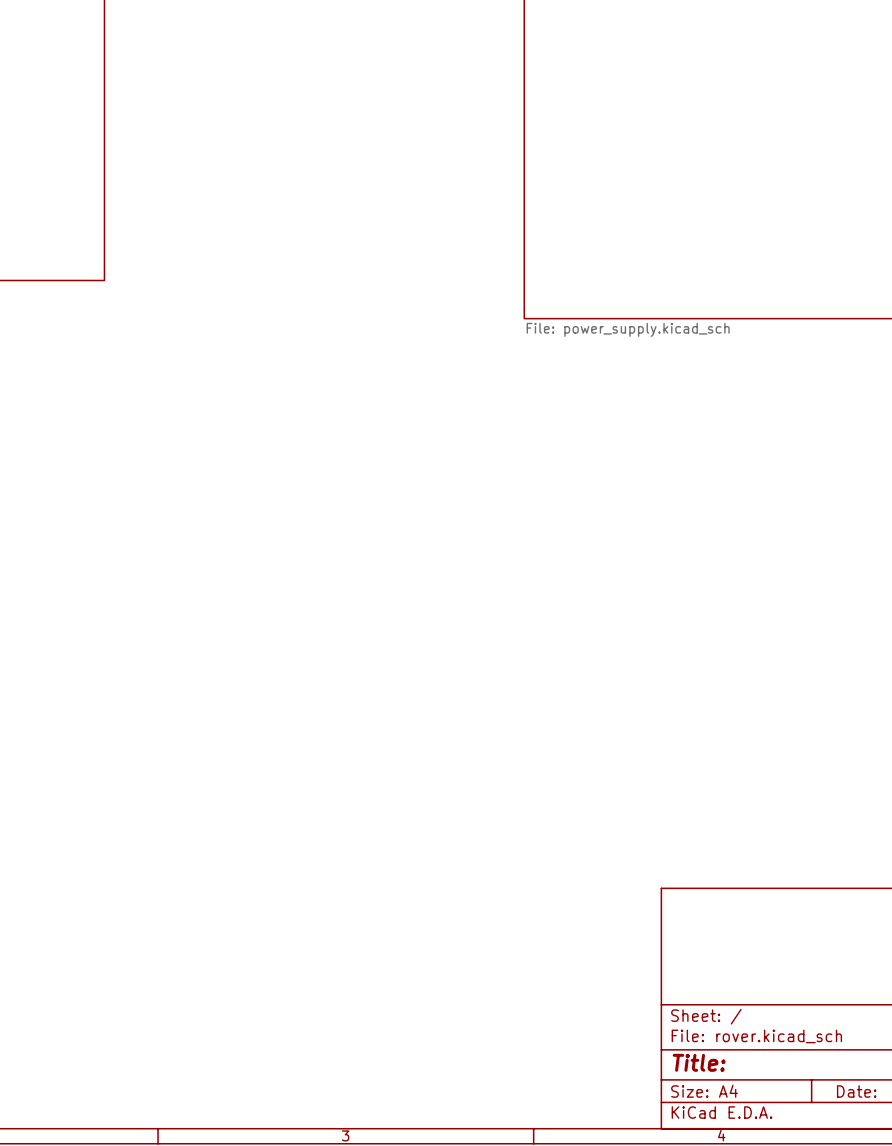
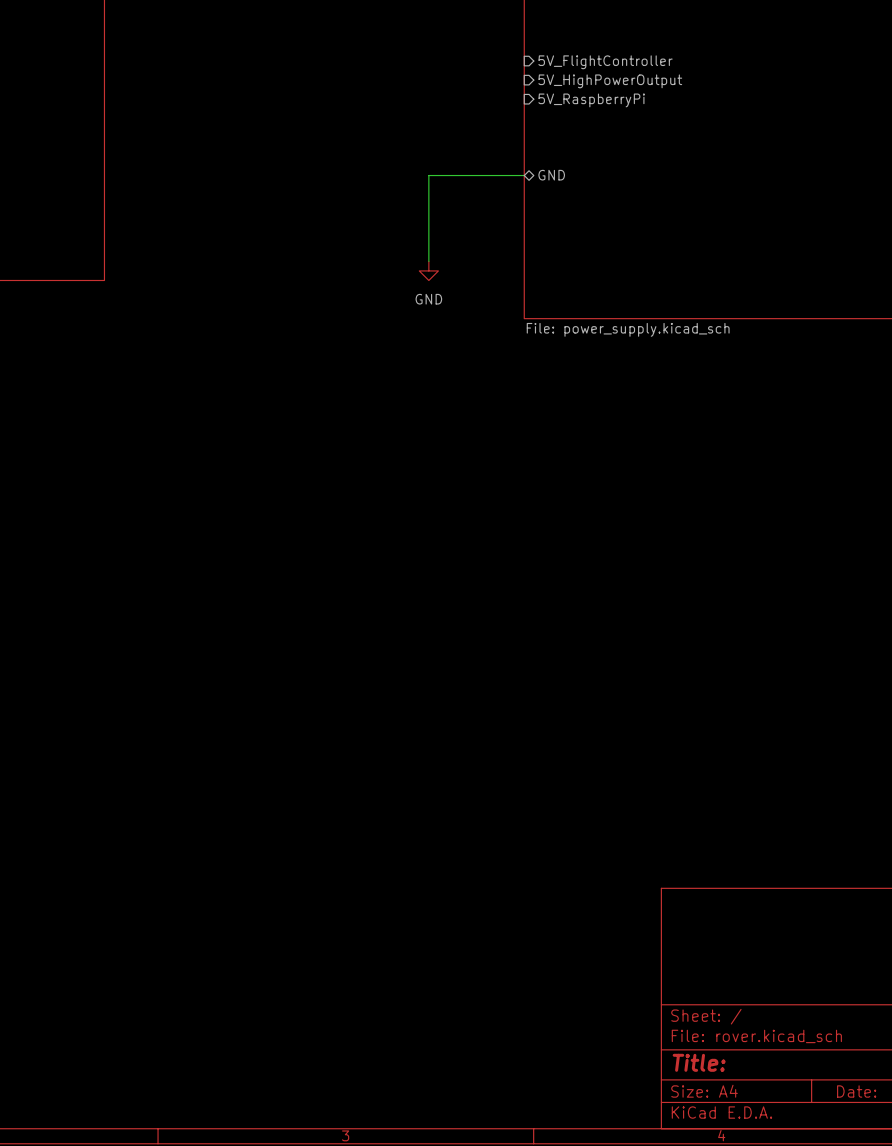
sheet pin: none -> 5V_FlightController (605, 62)
sheet pin: none -> 5V_HighPowerOutput (610, 81)
sheet pin: none -> 5V_RaspberryPi (591, 100)
wire: none -> (524, 175) (428, 175) (428, 261)
sheet pin: none -> GND (551, 175)
power symbol: none -> GND (428, 270)

